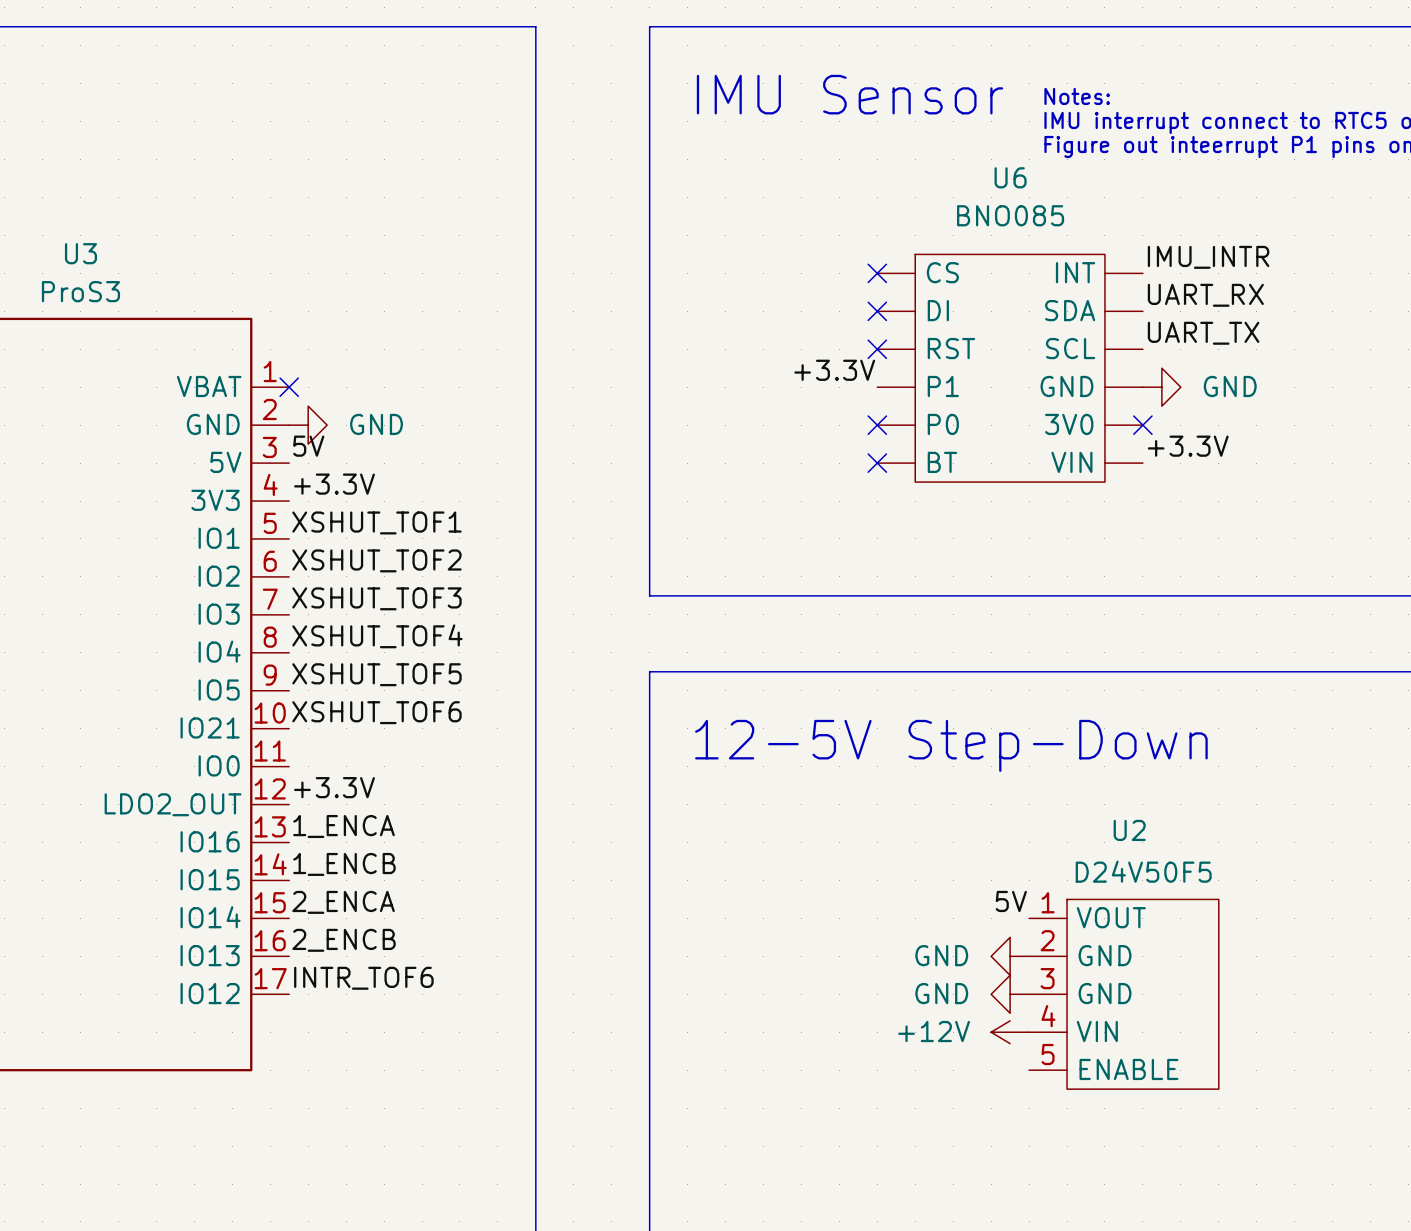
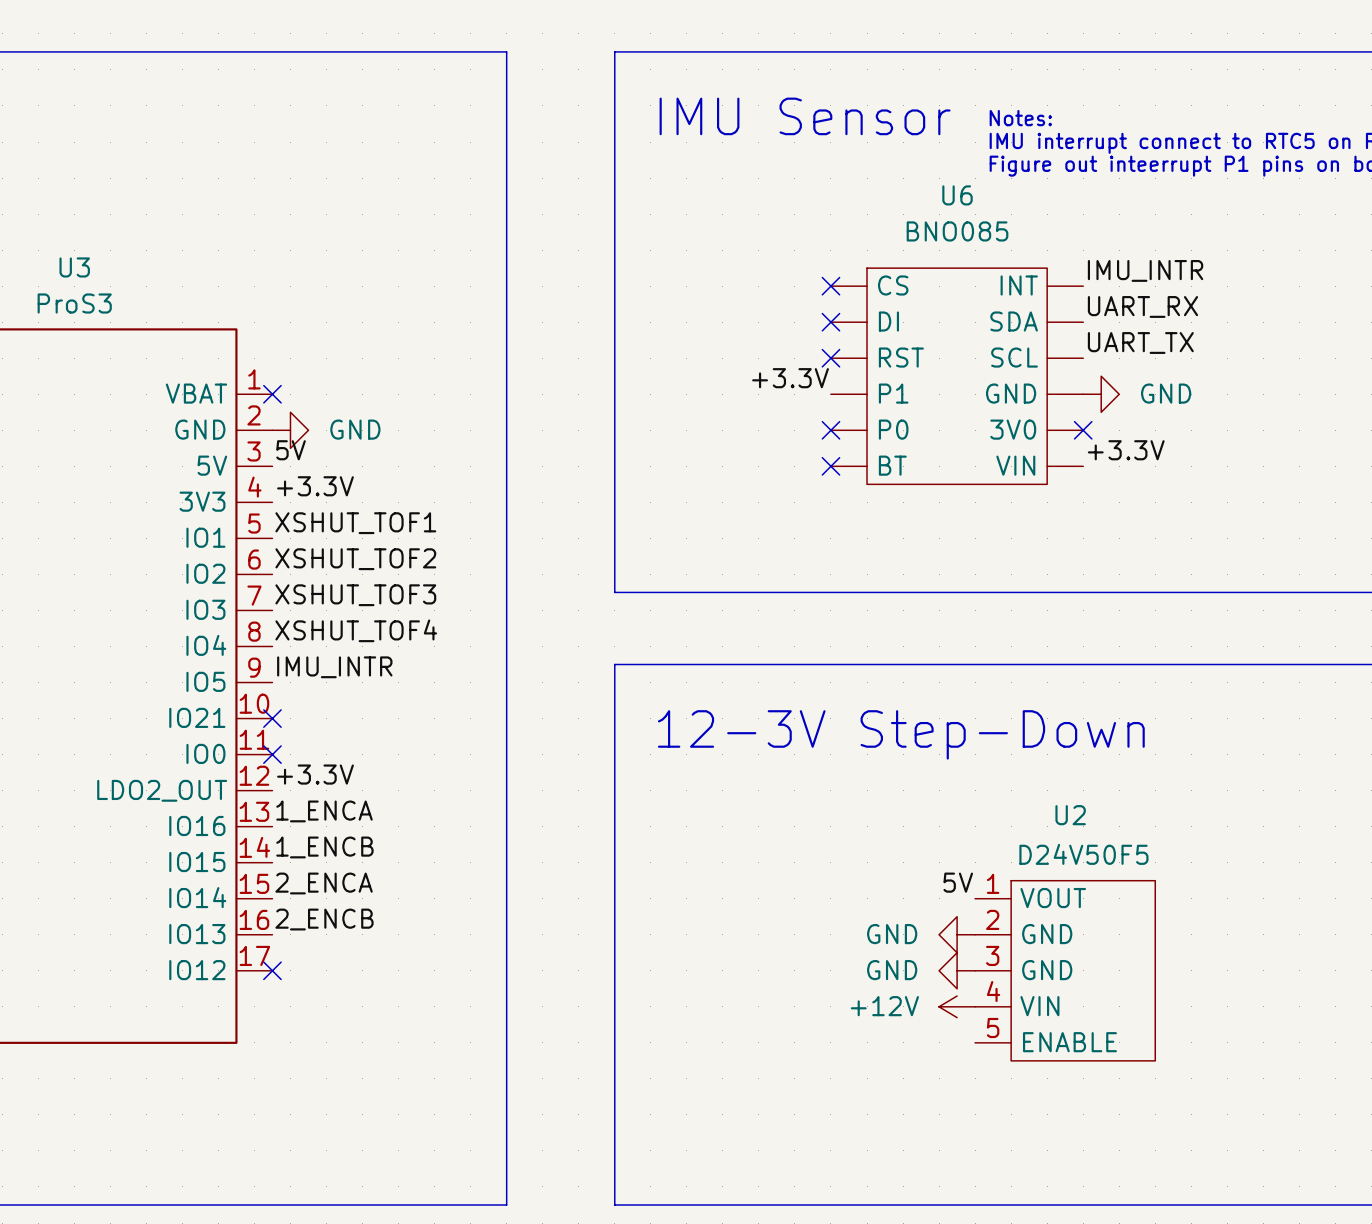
label: XSHUT_TOF5 (376, 674) -> IMU_INTR (334, 667)
label: XSHUT_TOF6 (376, 712) -> none
no-connect mark: none -> (272, 718)
text: 12-5V Step-Down (951, 745) -> 12-3V Step-Down (901, 734)
no-connect mark: none -> (272, 754)
label: INTR_TOF6 (363, 978) -> none
no-connect mark: none -> (272, 970)

